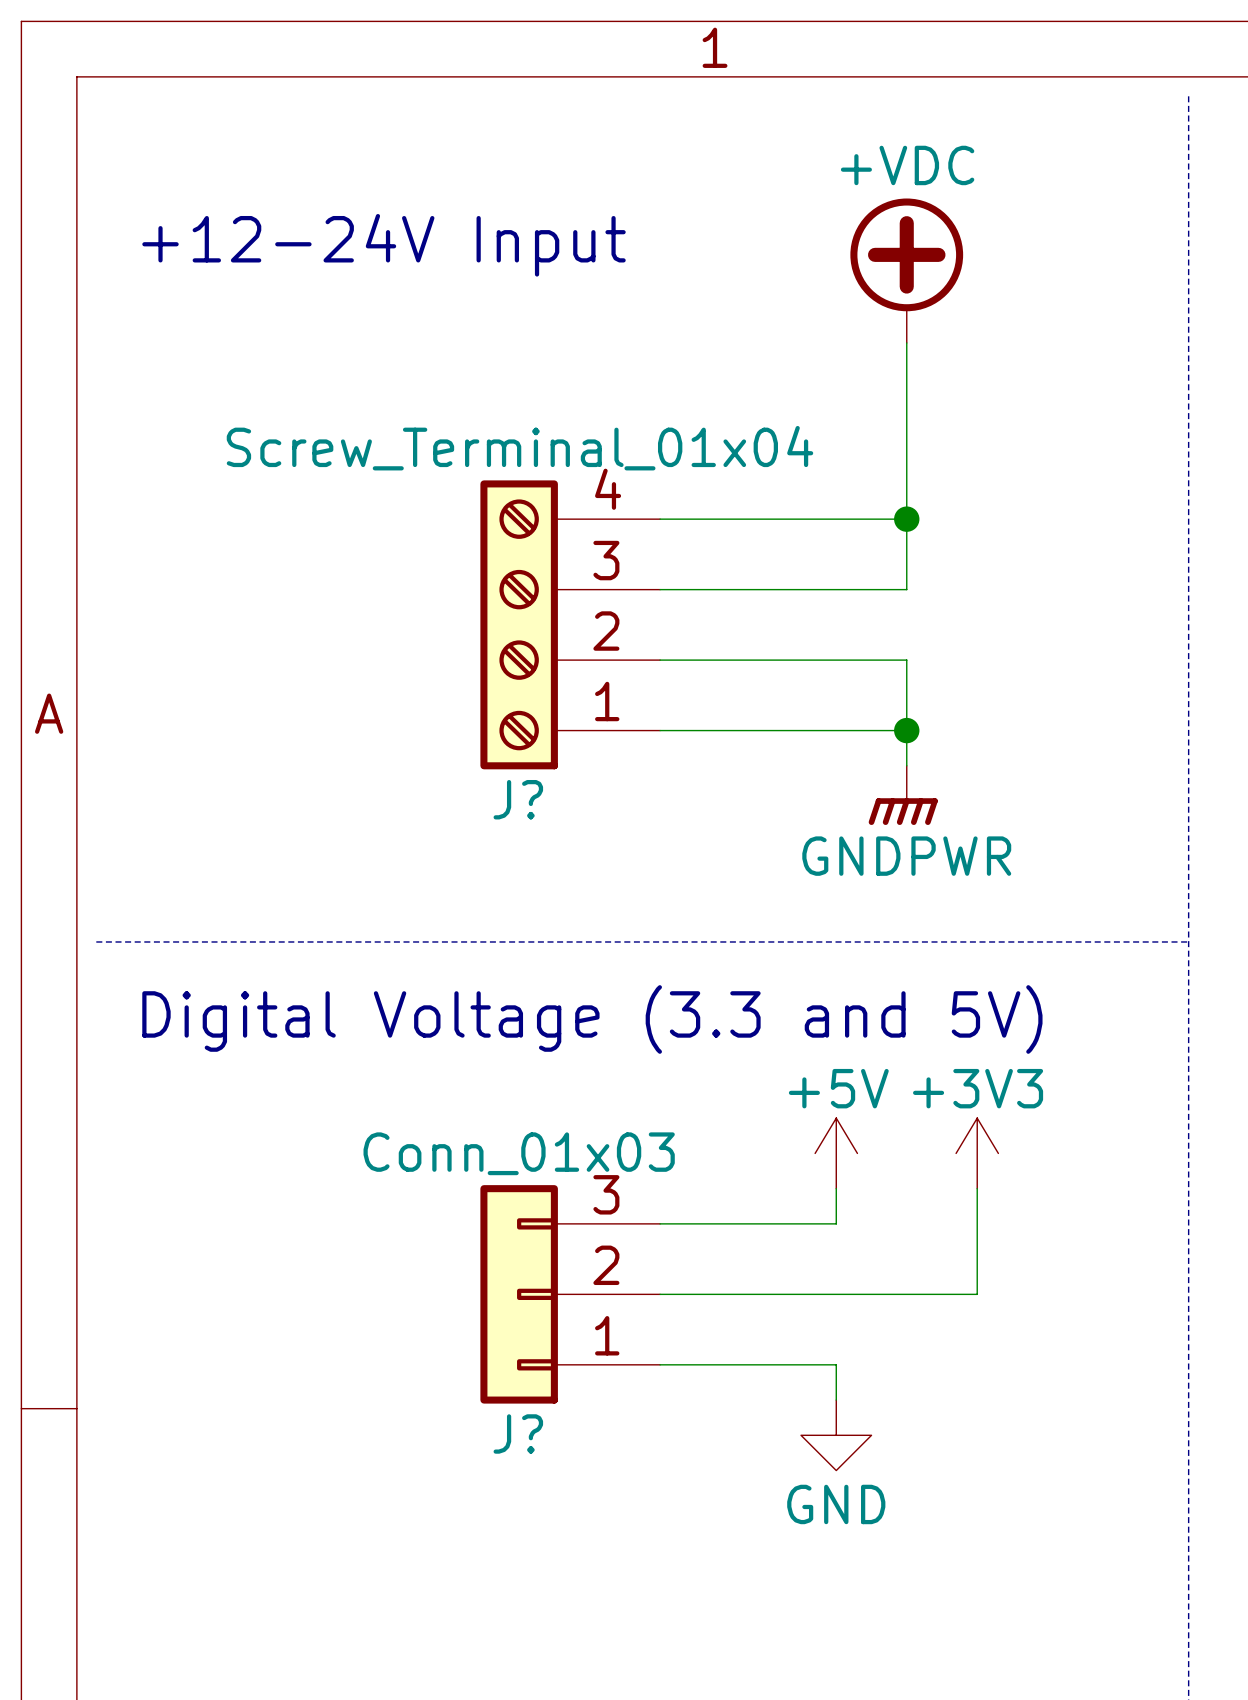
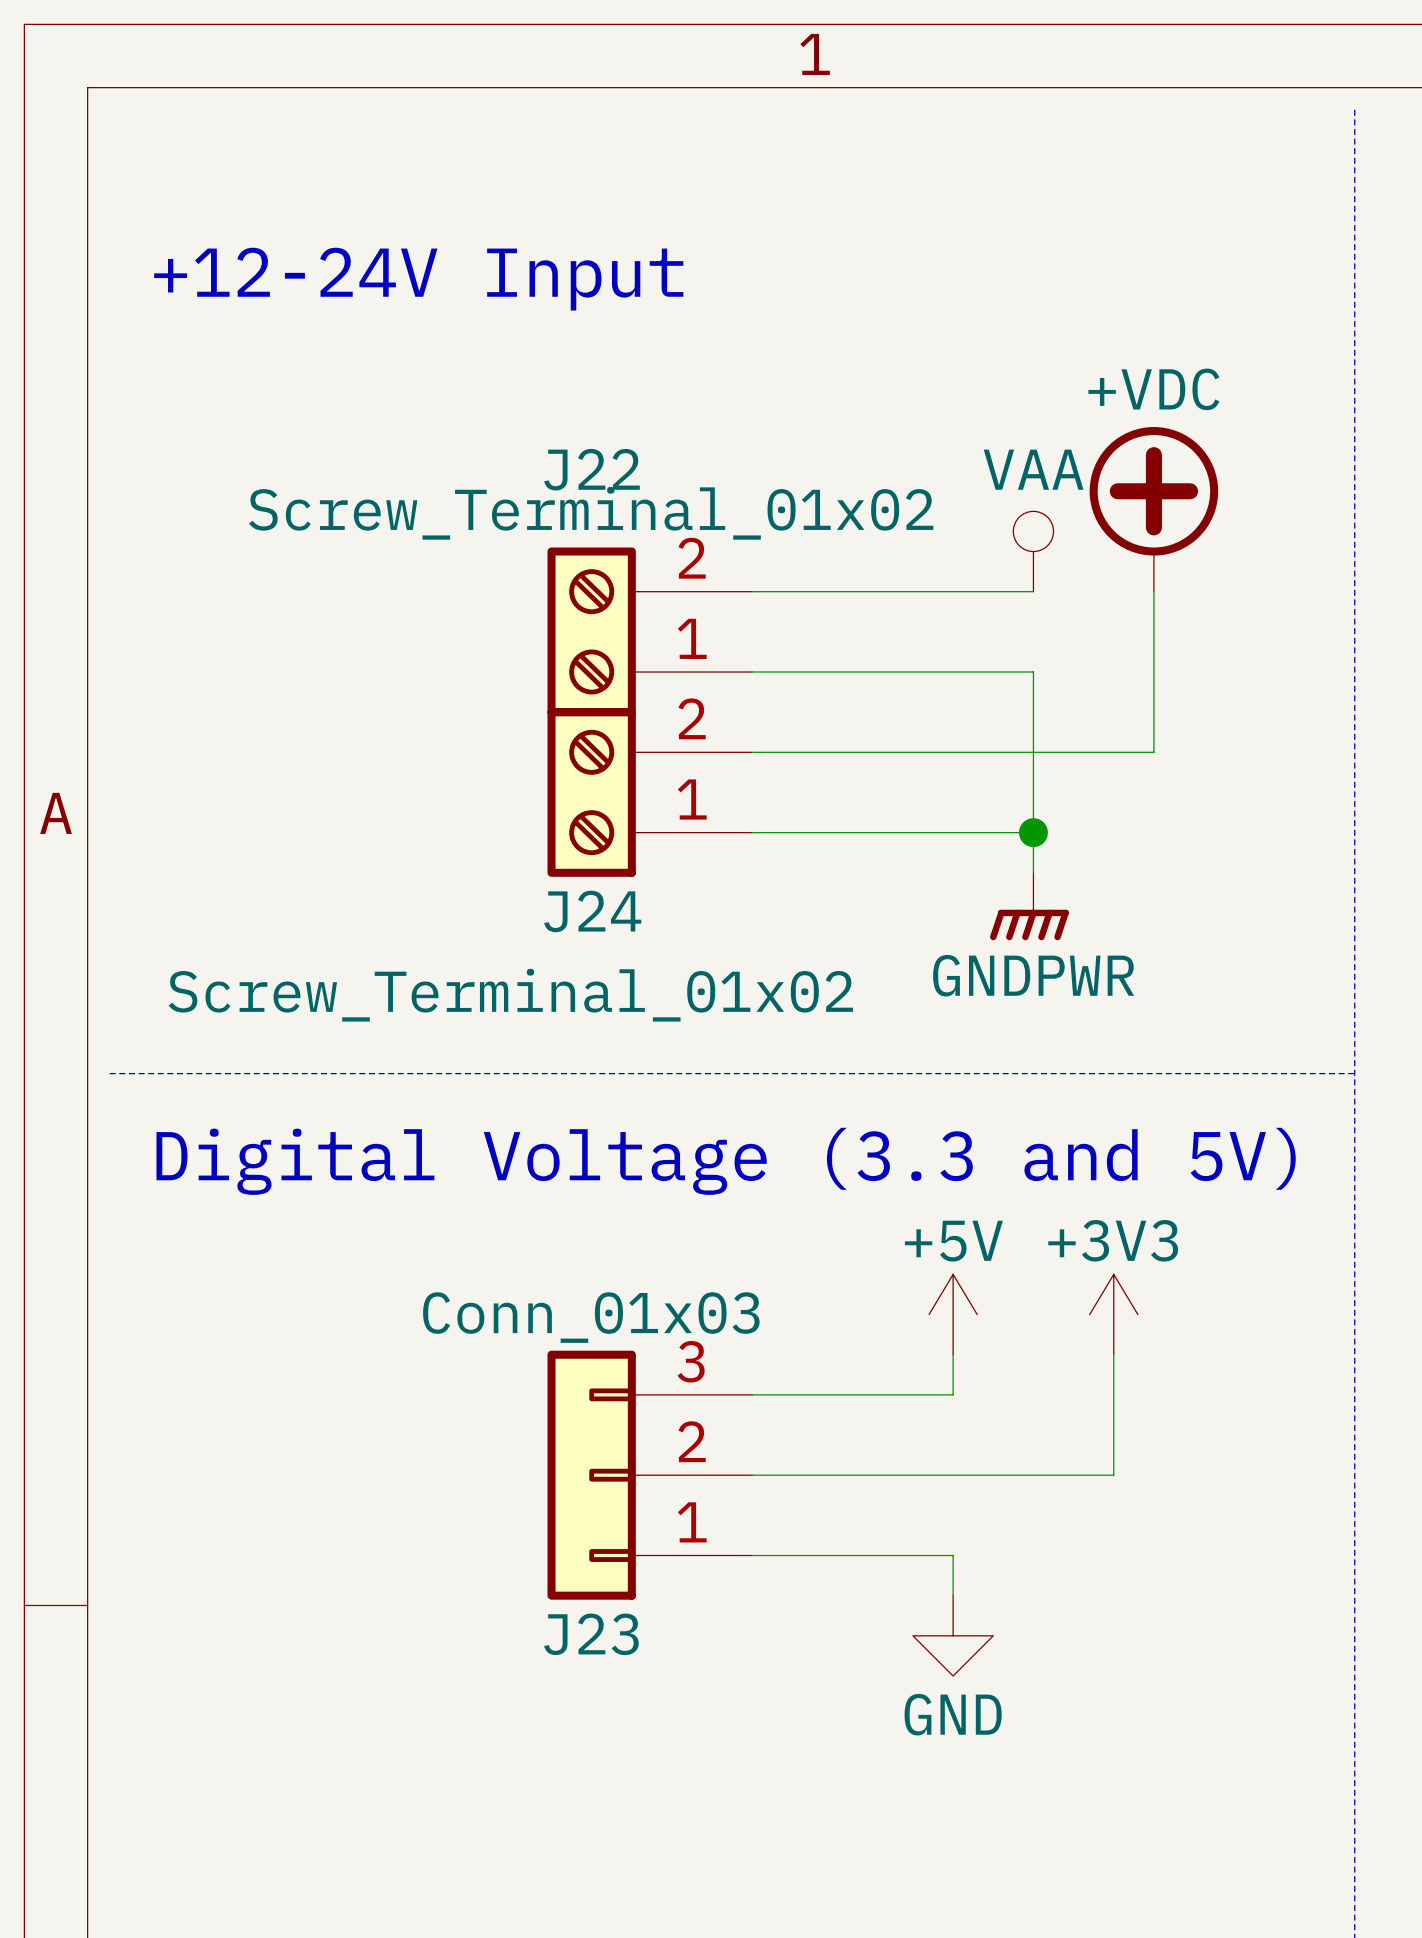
power symbol position: +VDC (906, 270) -> +VDC (1153, 509)
wire: (906, 342) (906, 589) -> (1153, 591) (1153, 752) (1033, 752) (1033, 672)
power symbol: none -> VAA (1033, 551)
junction: (906, 519) -> none
J22: none -> Screw_Terminal_01x02 (649, 631)
J?: Screw_Terminal_01x04 (570, 624) -> none
J24: none -> Screw_Terminal_01x02 (649, 792)
J? name: J? (518, 1433) -> J23 (591, 1634)

